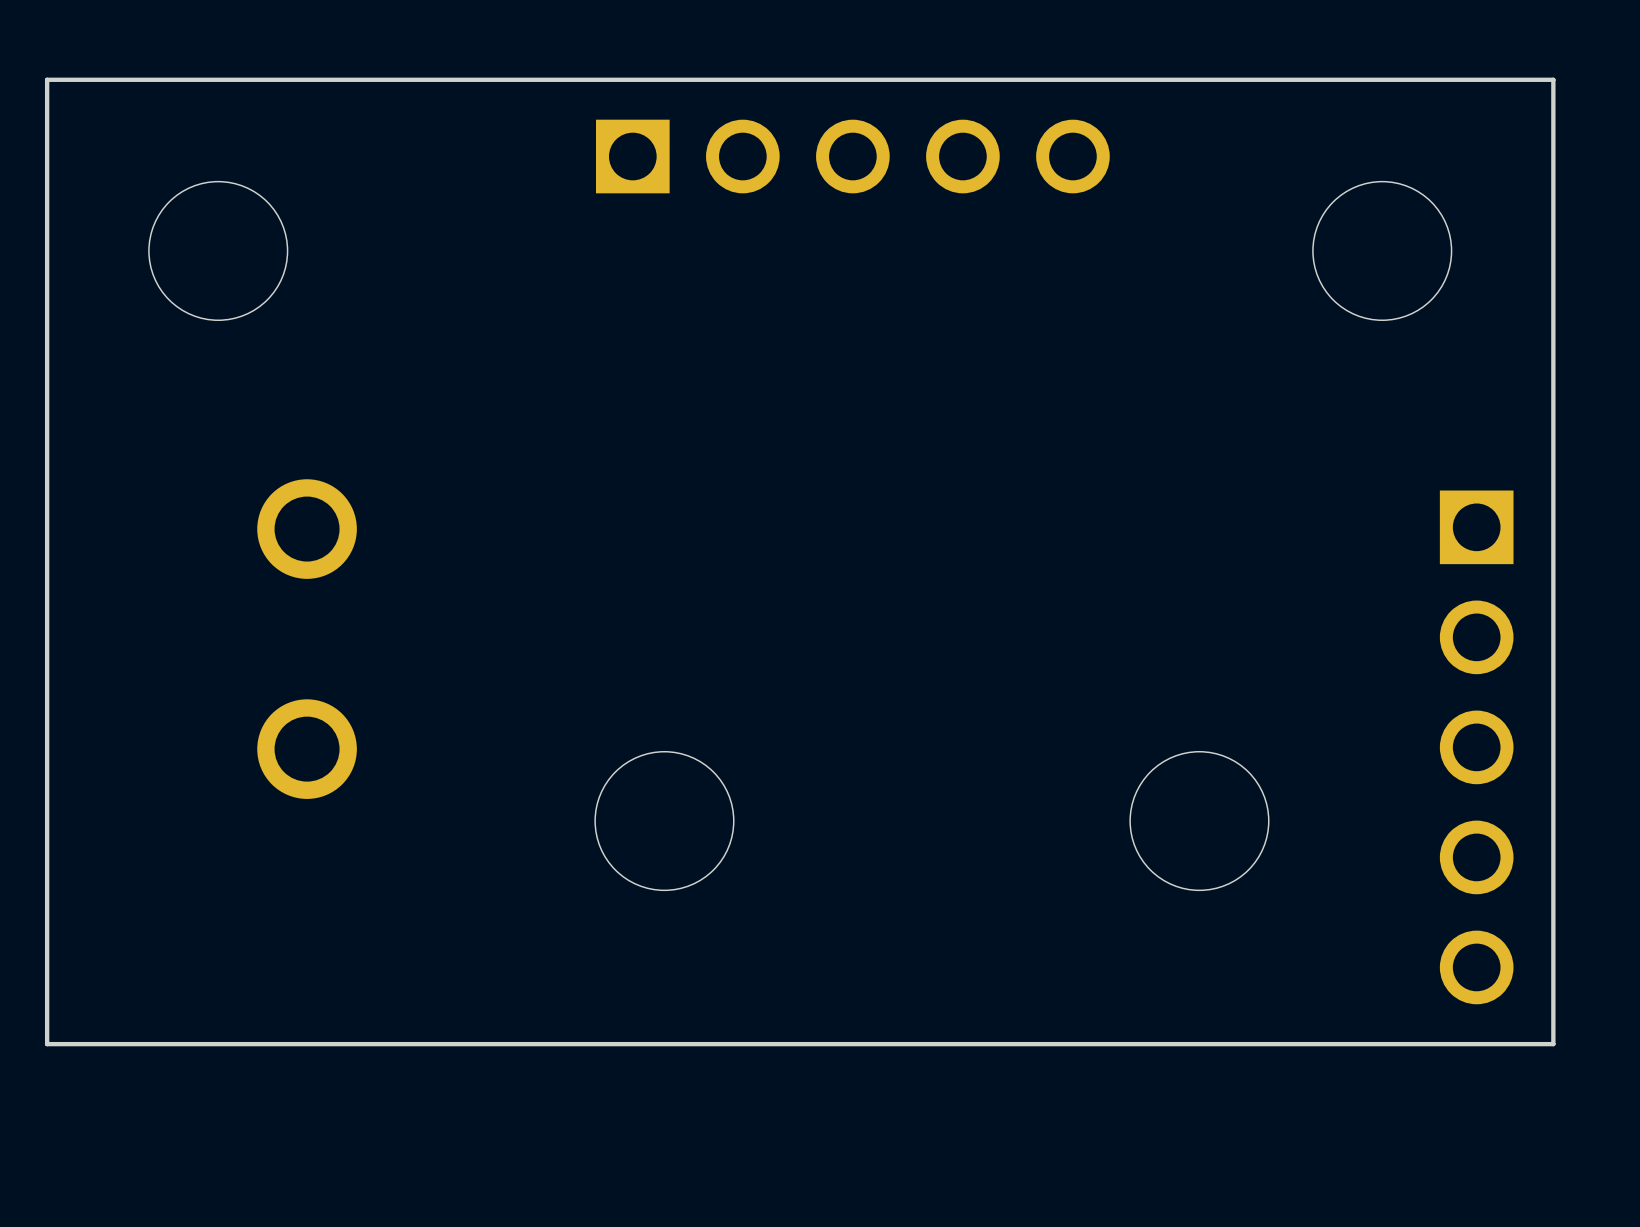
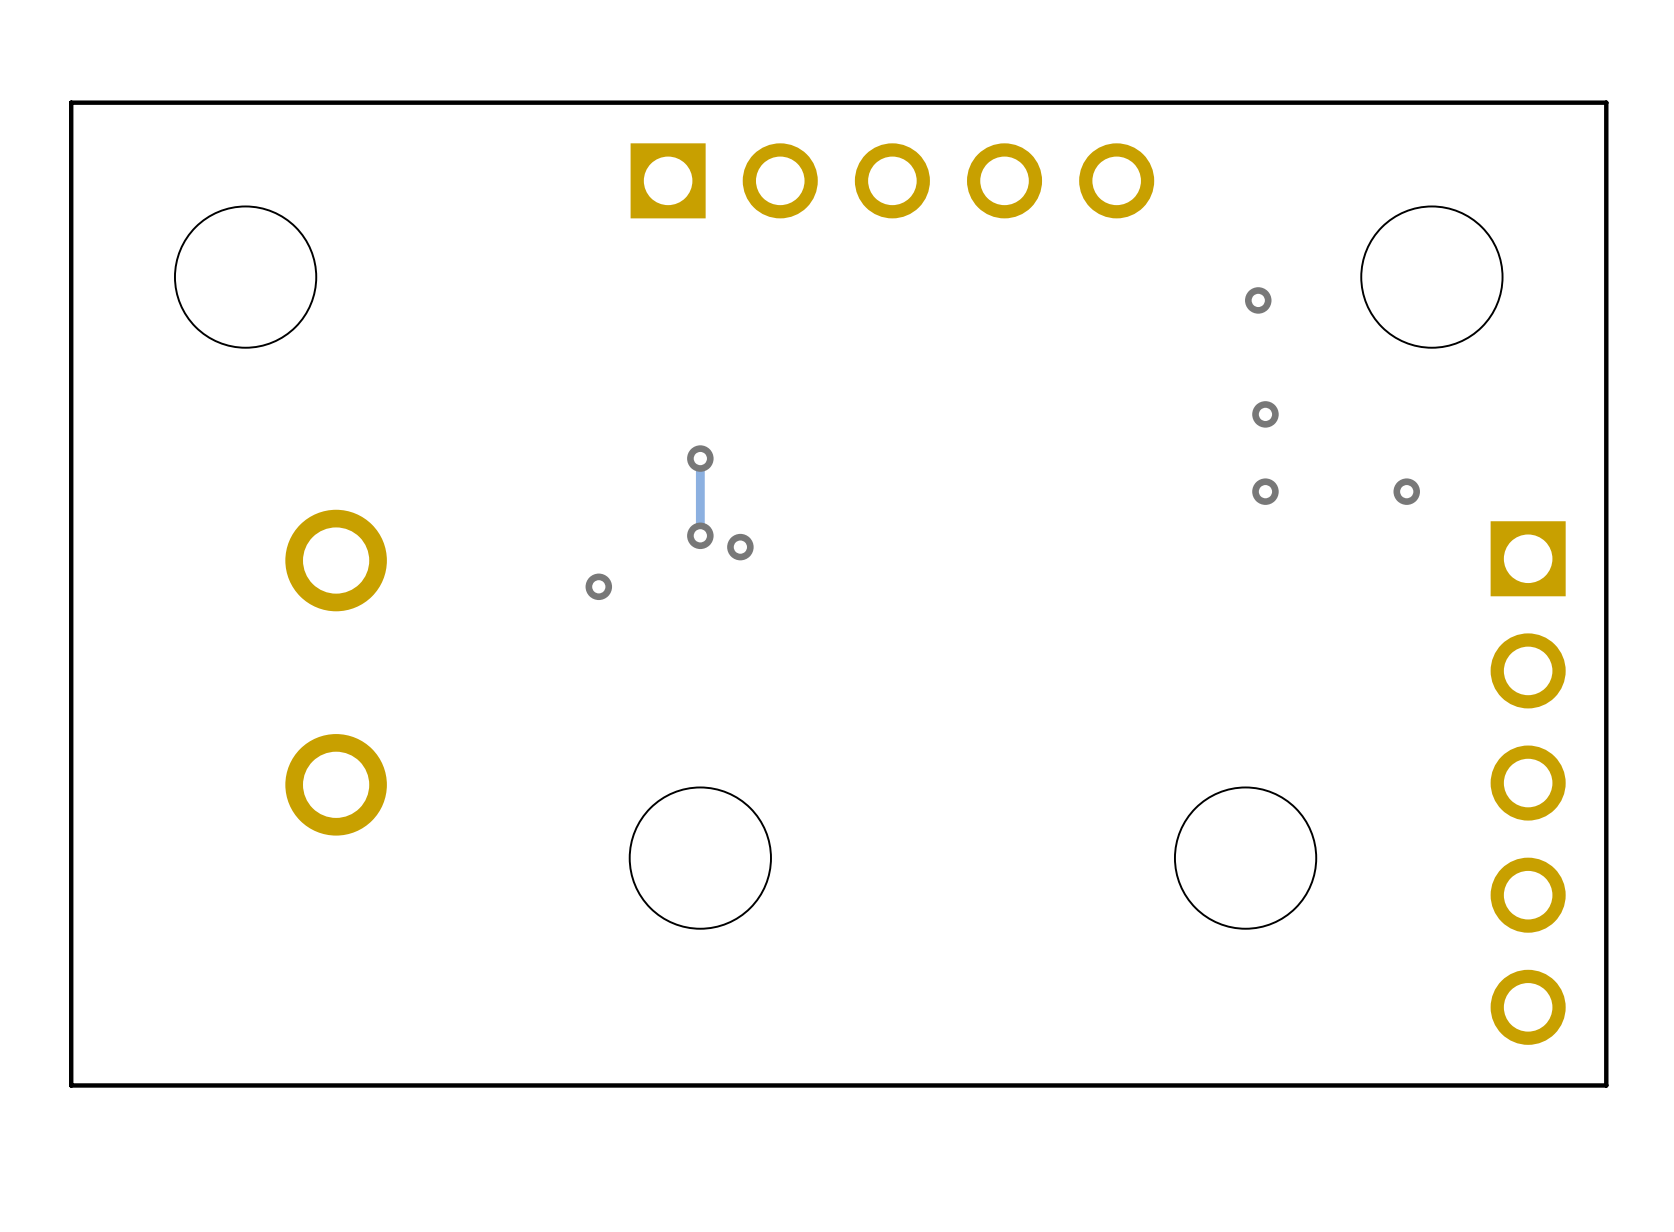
via: none -> (1258, 300)
via: none -> (1265, 414)
track: none -> (700, 458) (700, 535)
via: none -> (700, 458)
via: none -> (1265, 491)
via: none -> (1406, 491)
via: none -> (700, 535)
via: none -> (740, 547)
via: none -> (598, 586)

